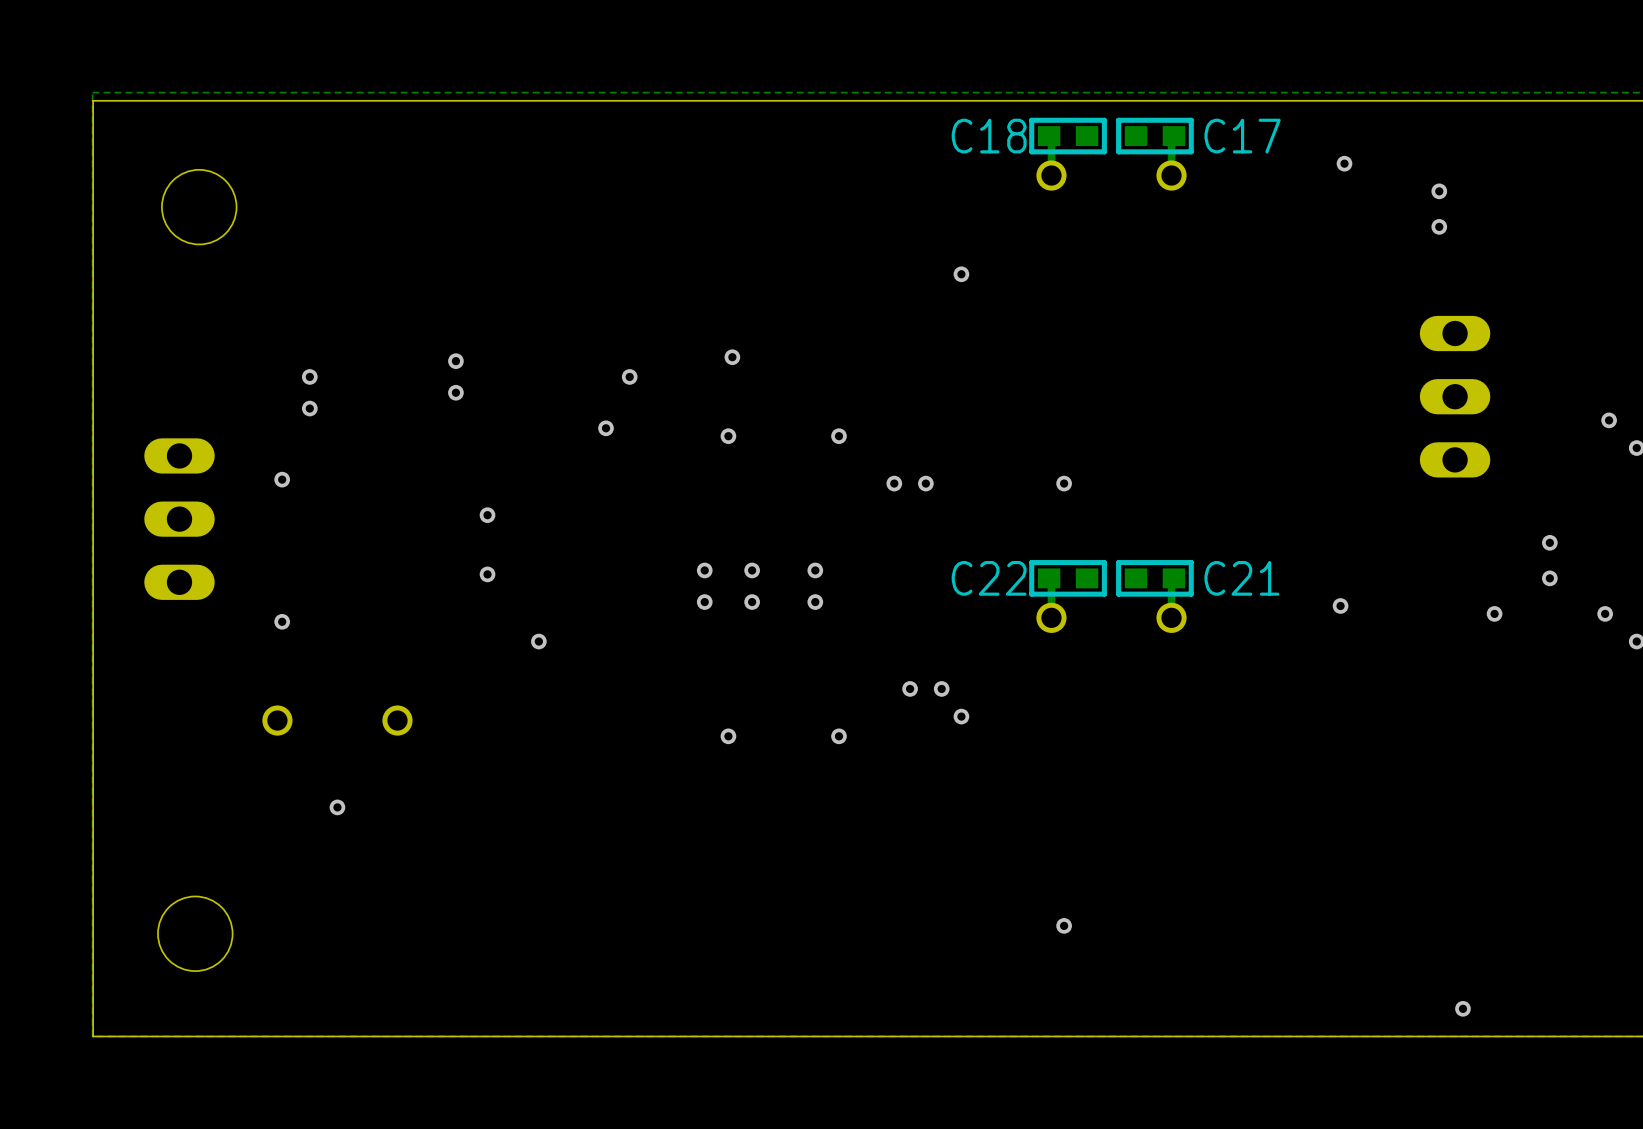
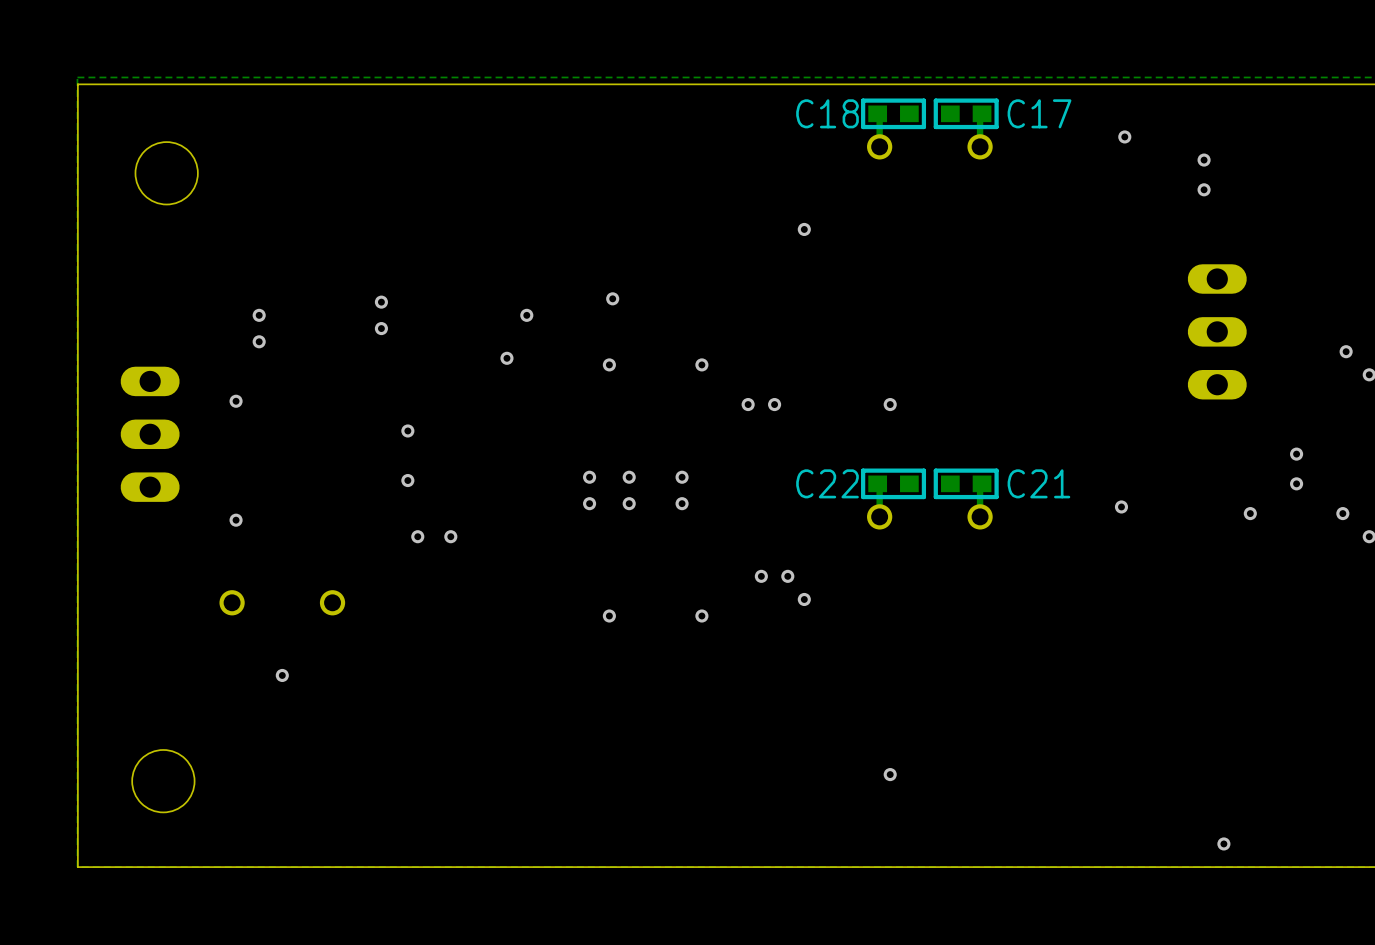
via: none -> (417, 536)

